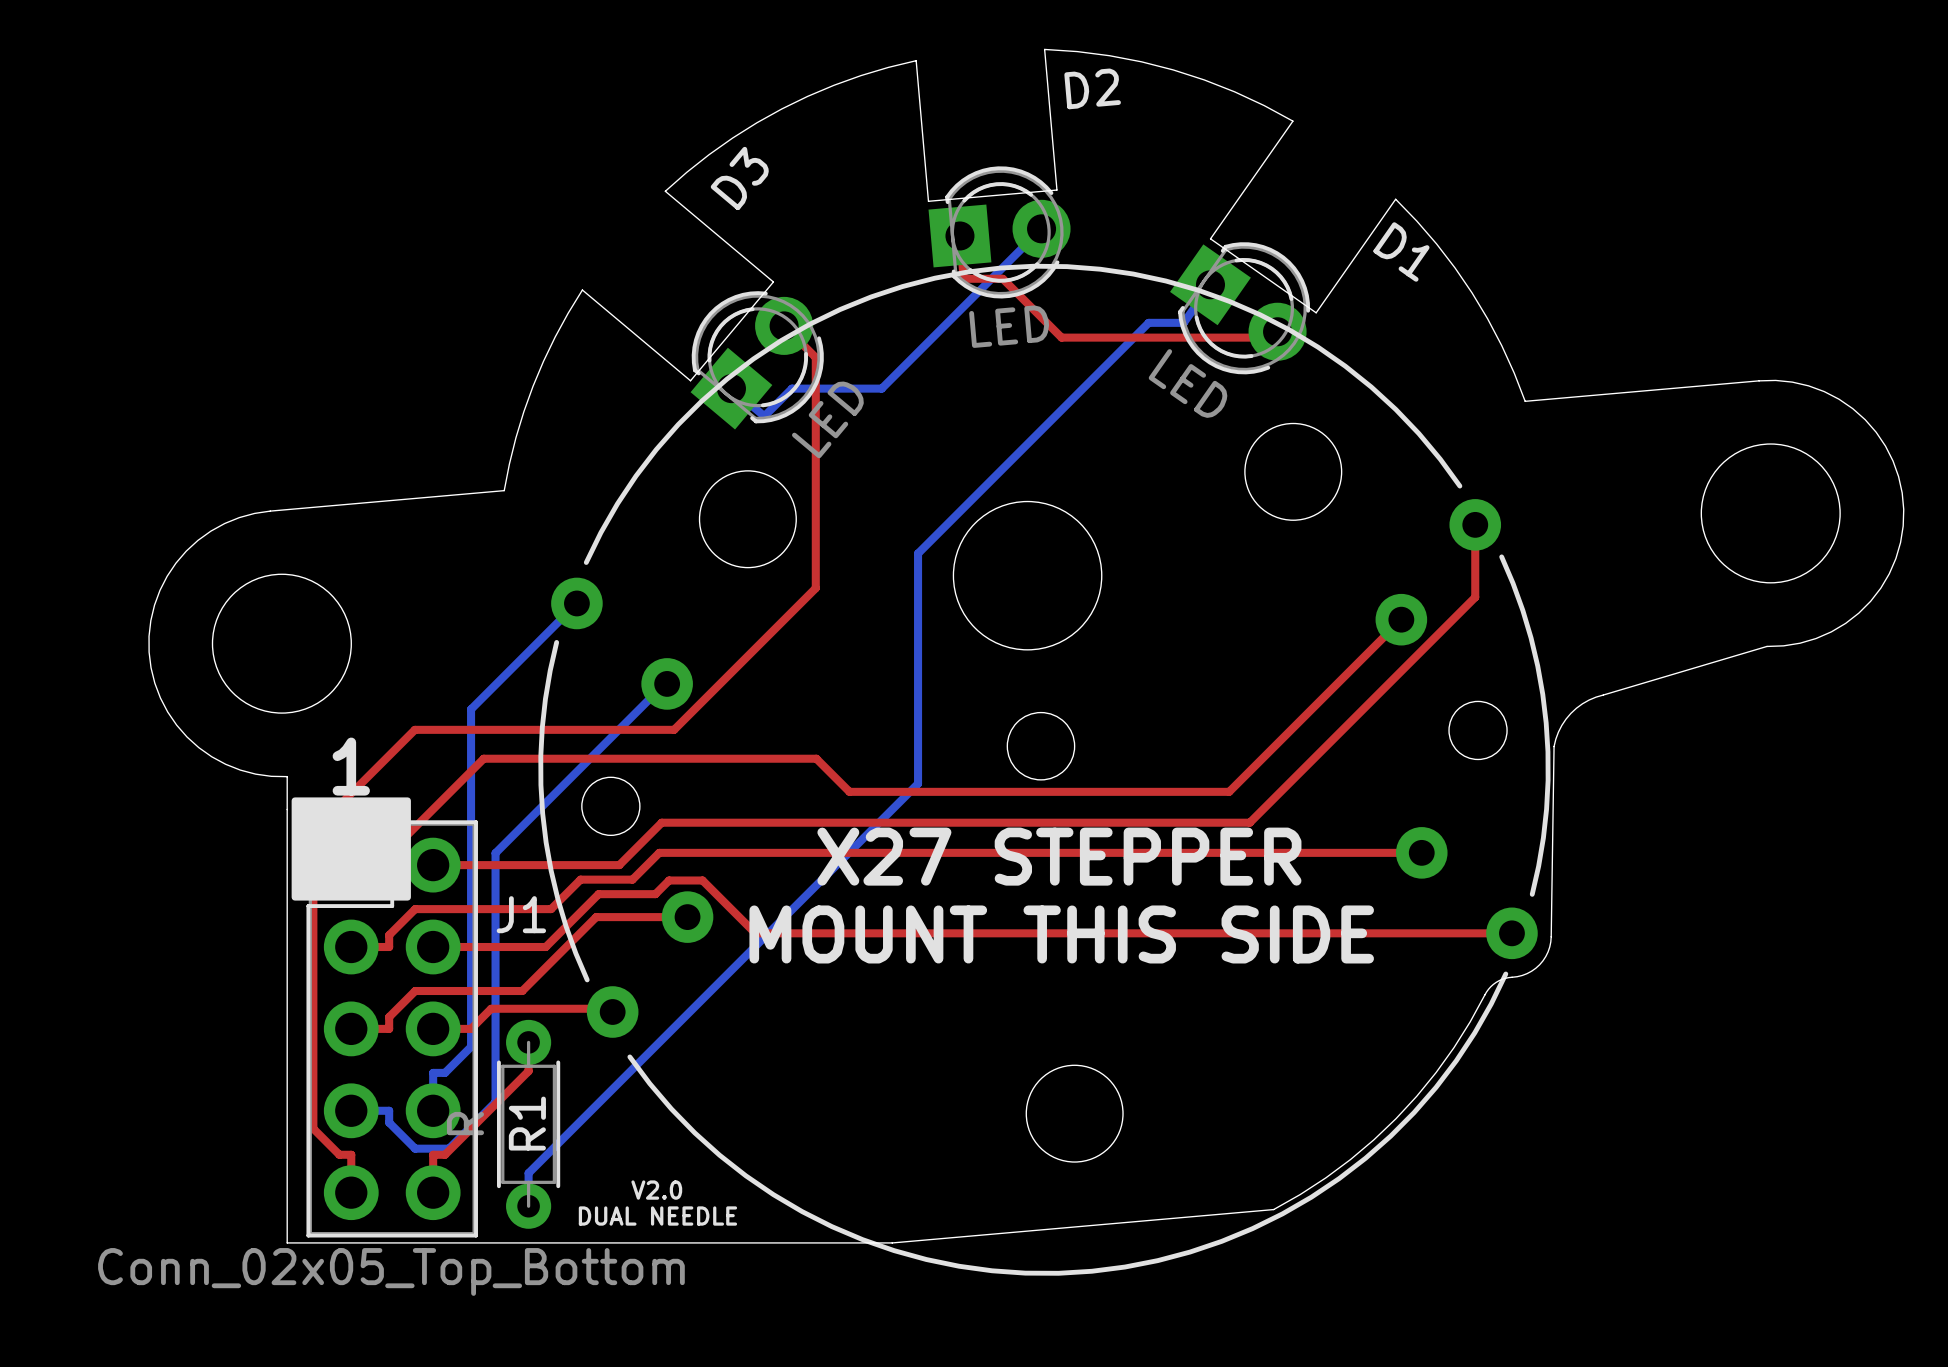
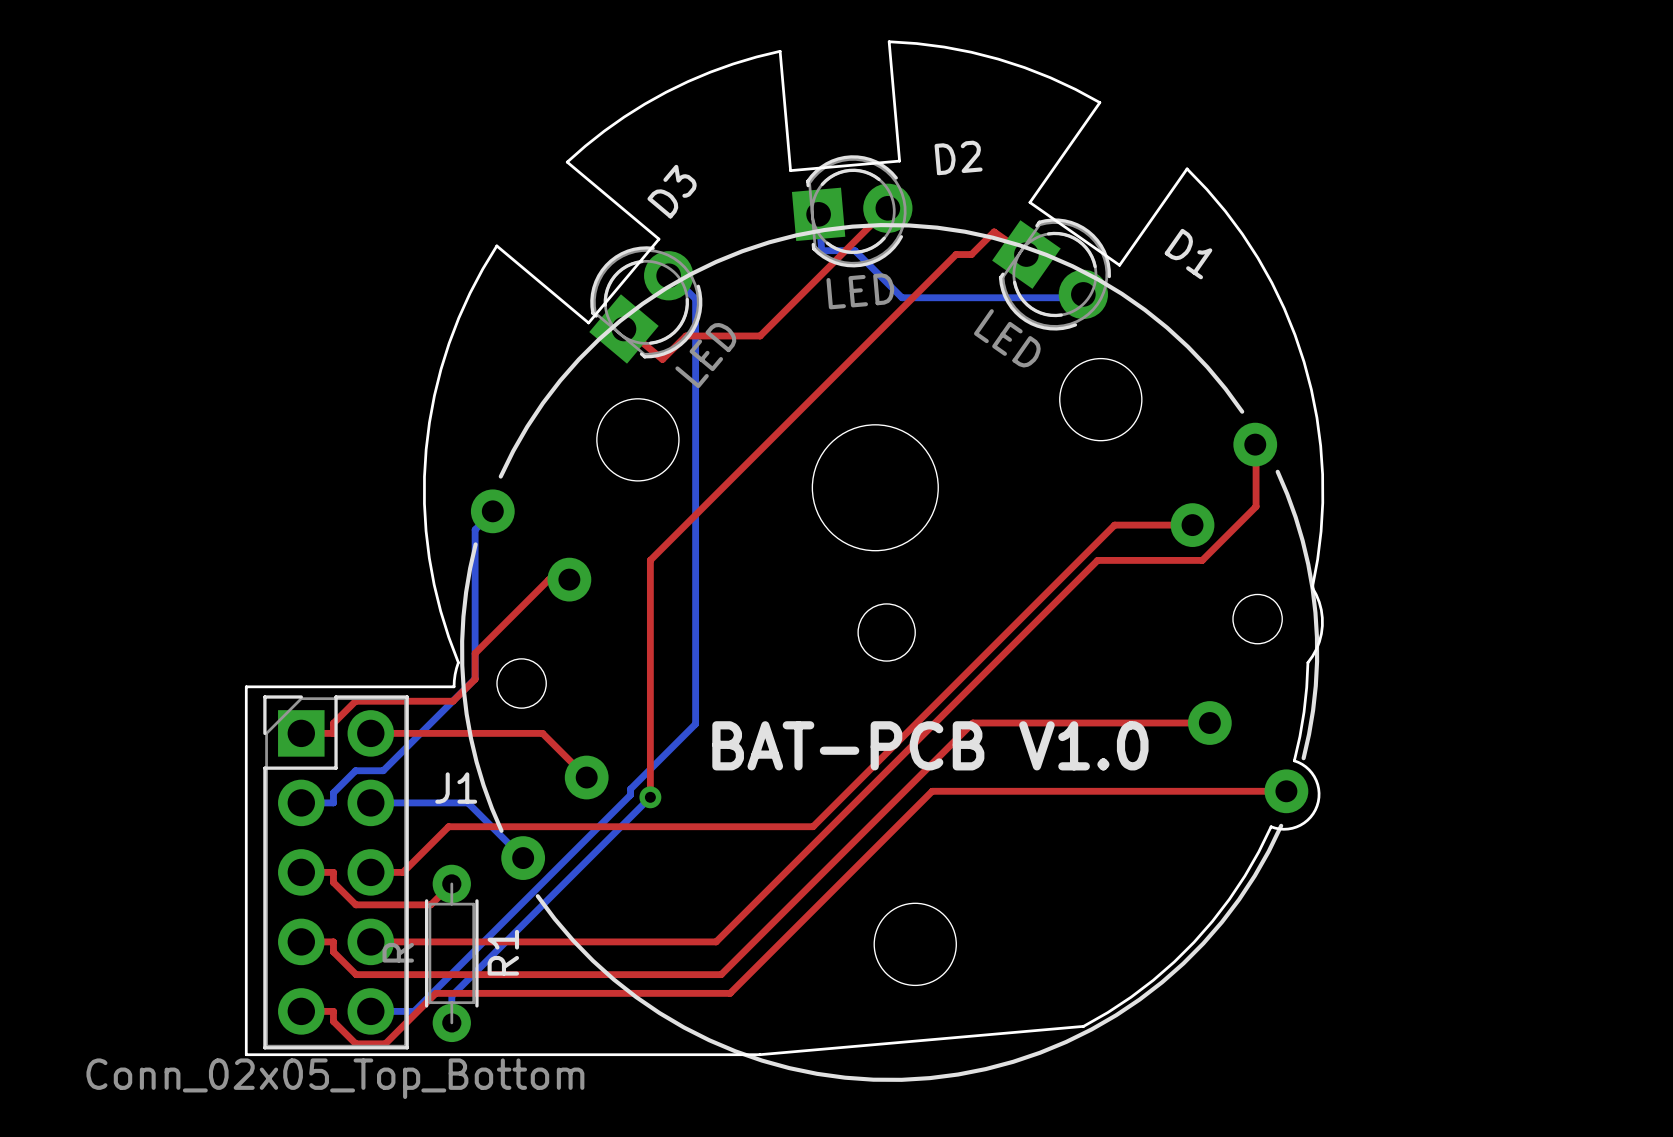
board edge: (1044, 49) (1056, 190) (928, 201) (916, 60) (860, 75) (807, 96) (781, 108) (732, 138) (709, 154) (665, 191) (773, 281) (690, 380) (582, 290) (555, 336) (533, 386) (515, 437) (504, 490) (254, 513) (224, 523) (210, 531) (186, 551) (167, 576) (154, 605) (150, 620) (149, 652) (154, 683) (167, 712) (187, 737) (211, 756) (225, 764) (255, 774) (287, 776) (287, 1242) (892, 1242) (1273, 1209) (1325, 1177) (1373, 1139) (1416, 1096) (1436, 1072) (1453, 1047) (1490, 986) (1502, 979) (1522, 975) (1531, 971) (1545, 956) (1551, 936) (1554, 746) (1558, 732) (1570, 713) (1582, 703) (1596, 697) (1766, 646) (1783, 645) (1816, 638) (1831, 631) (1858, 613) (1880, 588) (1895, 558) (1900, 542) (1903, 509) (1902, 492) (1898, 476) (1885, 446) (1865, 419) (1839, 399) (1808, 385) (1775, 380) (1525, 401) (1501, 345) (1472, 292) (1436, 243) (1395, 199) (1316, 312) (1210, 238) (1292, 121) (1234, 91) (1173, 69) (1109, 55) (1044, 49) -> (889, 41) (899, 161) (790, 170) (780, 51) (733, 63) (666, 92) (624, 116) (567, 162) (658, 239) (588, 322) (496, 245) (470, 293) (449, 343) (434, 395) (426, 449) (424, 476) (426, 531) (434, 584) (440, 611) (458, 662) (454, 686) (246, 686) (246, 1054) (759, 1054) (1083, 1026) (1131, 997) (1174, 961) (1194, 942) (1212, 921) (1244, 876) (1271, 826) (1283, 829) (1296, 827) (1304, 822) (1313, 813) (1318, 797) (1317, 784) (1309, 769) (1294, 760) (1304, 712) (1307, 662) (1319, 641) (1322, 625) (1321, 609) (1312, 587) (1321, 531) (1322, 502) (1320, 445) (1311, 389) (1304, 362) (1295, 334) (1271, 282) (1242, 234) (1206, 189) (1187, 168) (1119, 265) (1029, 202) (1099, 102) (1050, 77) (998, 59) (944, 47) (889, 41)
D2 name position: D2 (1092, 88) -> D2 (958, 157)
D3 name position: D3 (739, 178) -> D3 (672, 191)
bottom track: (1041, 228) (881, 388) (791, 388) (764, 416) (731, 388) -> none
D2 position: (999, 232) -> (852, 211)
top track: (959, 235) (963, 278) (1002, 278) (1061, 337) (1271, 337) (1277, 331) -> none
top track: none -> (887, 208) (760, 335) (685, 335) (662, 359) (634, 335)
D1 name position: D1 (1401, 252) -> D1 (1188, 254)
bottom track: none -> (818, 214) (821, 250) (854, 250) (902, 297) (1080, 297) (1083, 294)
bottom track: (1210, 284) (1183, 322) (1148, 322) (918, 553) (918, 783) (528, 1173) -> (650, 797) (451, 994)
top track: none -> (1026, 254) (994, 231) (971, 254) (956, 254) (650, 560) (650, 797)
D1 position: (1240, 308) -> (1051, 274)
top track: (784, 325) (815, 357) (815, 588) (674, 729) (414, 729) (313, 831) (313, 1128) (339, 1154) (351, 1154) (351, 1192) -> none
bottom track: none -> (679, 282) (695, 299) (695, 724) (630, 789) (630, 795) (414, 1011) (370, 1011)
round board edge: [1701, 443, 1841, 583] -> none
top track: (1475, 524) (1475, 597) (1249, 822) (661, 822) (619, 865) -> (1256, 444) (1256, 506) (1202, 560) (1097, 560) (716, 941) (370, 941)
round board edge: [212, 574, 352, 714] -> none
bottom track: (576, 603) (471, 709) (471, 1046) (445, 1072) (433, 1072) (433, 1110) -> (493, 511) (475, 529) (475, 678) (383, 770) (355, 770) (333, 792) (333, 802) (301, 802)
top track: (1401, 619) (1229, 791) (849, 791) (816, 758) (483, 758) (415, 827) -> (1192, 525) (1114, 525) (813, 826) (448, 826) (420, 855)
bottom track: (667, 683) (664, 683) (495, 853) (495, 1102) (449, 1148) (415, 1148) (389, 1122) (389, 1110) (351, 1110) -> none
top track: none -> (569, 579) (548, 579) (475, 653) (475, 679) (453, 701) (355, 701)
text: 1 (351, 766) -> none
drawing: [291, 797, 411, 901] -> none
top track: (1142, 852) (659, 852) (632, 879) (580, 879) (551, 909) (415, 909) (389, 935) (389, 947) (351, 947) -> (972, 723) (721, 974) (356, 974) (333, 951) (333, 941) (301, 941)
text: X27 STEPPER (1059, 856) -> none
text: none -> BAT-PCB V1.0 (930, 745)
J1 name position: J1 (521, 914) -> J1 (456, 788)
top track: (687, 917) (596, 917) (522, 991) (415, 991) (389, 1017) (389, 1028) -> (586, 777) (542, 733) (528, 733)
top track: (1094, 933) (755, 933) (702, 880) (669, 880) (655, 894) (598, 894) (545, 947) (433, 947) -> (932, 791) (730, 993) (435, 993) (385, 1043) (355, 1043) (333, 1021) (333, 1011) (301, 1011)
text: MOUNT THIS SIDE (1061, 934) -> none
via: none -> (650, 797)
bottom track: none -> (370, 802) (467, 802) (523, 858)
top track: (491, 1008) (609, 1008) (612, 1012) -> none
top track: (528, 1042) (528, 1071) (445, 1154) (433, 1154) (433, 1192) -> (451, 883) (430, 904) (355, 904) (333, 882) (333, 872)
R1 name position: R1 (527, 1123) -> R1 (503, 952)
text: V2.0 (656, 1190) -> none
text: DUAL NEEDLE (657, 1216) -> none

